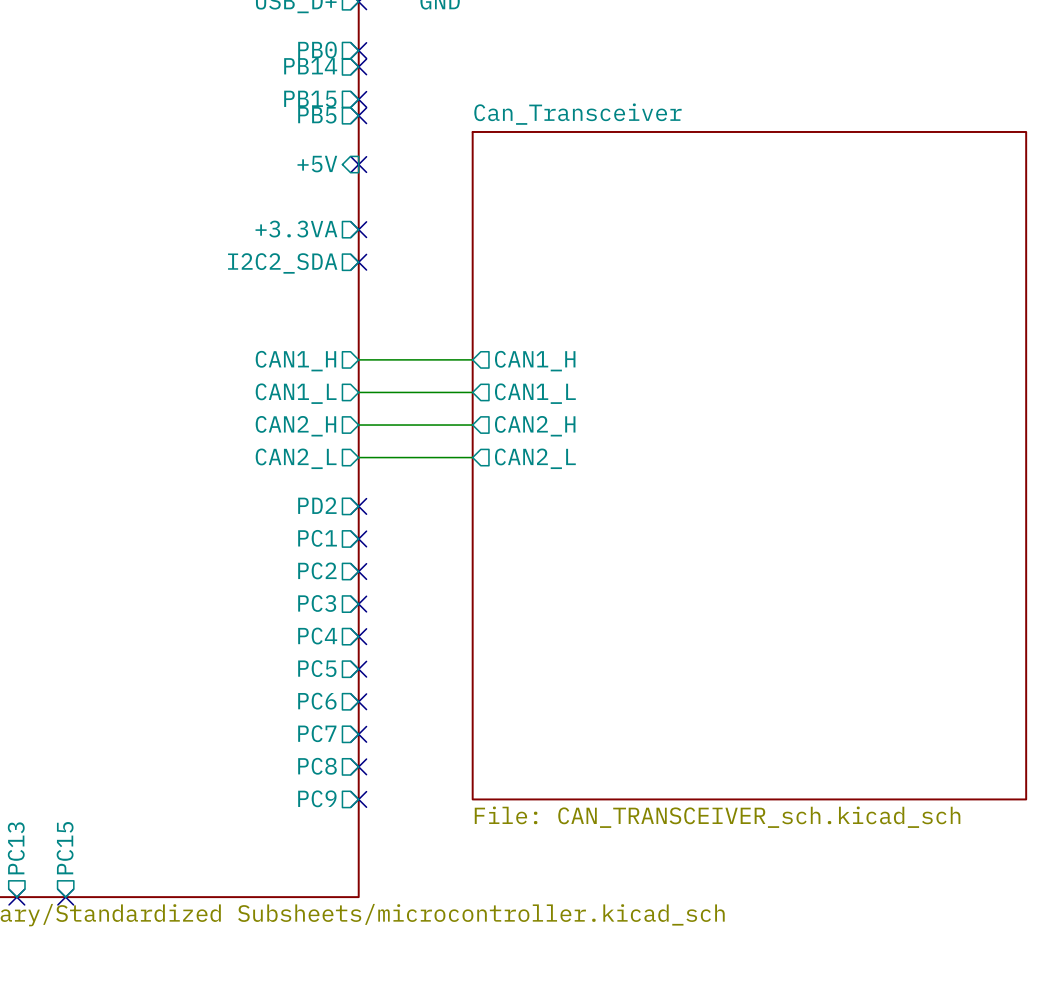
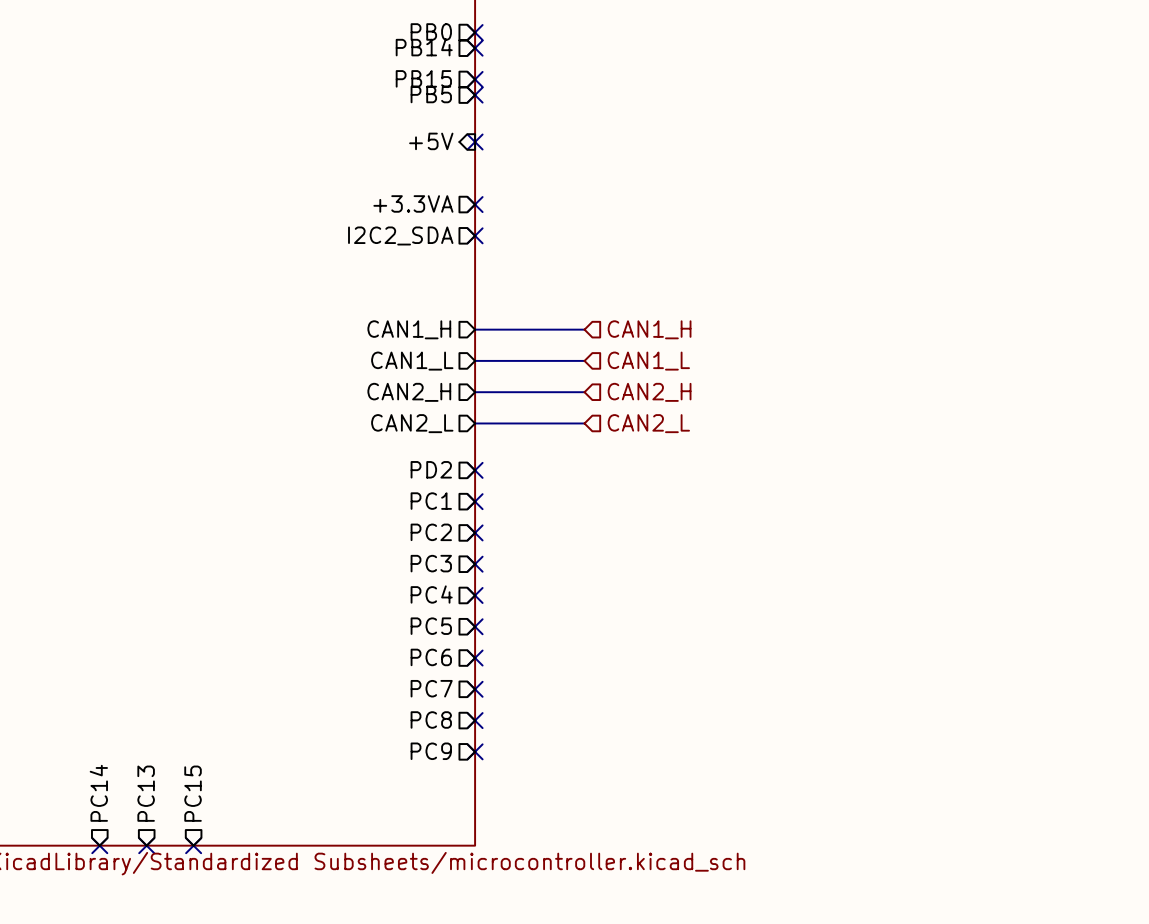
sheet pin: CAN1_H (535, 361) -> none
hierarchical label: none -> CAN1_H (649, 329)
sheet pin: CAN1_L (535, 393) -> none
hierarchical label: none -> CAN1_L (648, 361)
sheet pin: CAN2_H (535, 426) -> none
hierarchical label: none -> CAN2_H (649, 392)
sheet pin: CAN2_L (535, 458) -> none
hierarchical label: none -> CAN2_L (648, 423)
sheet Can_Transceiver: File: CAN_TRANSCEIVER_sch.kicad_sch (749, 465) -> none

